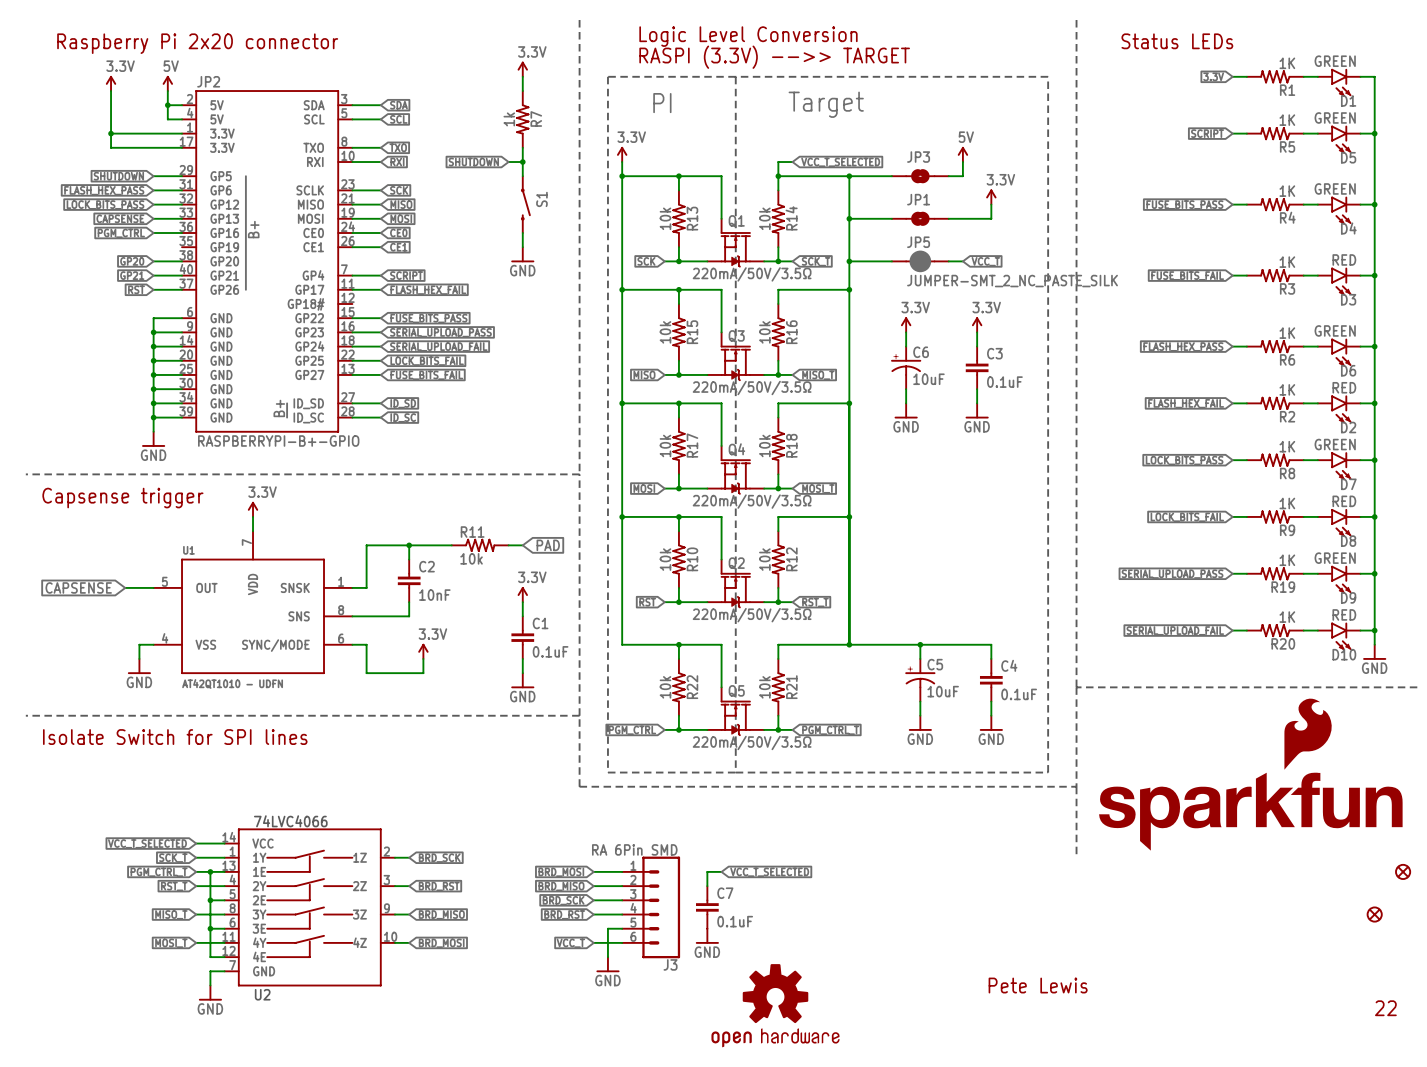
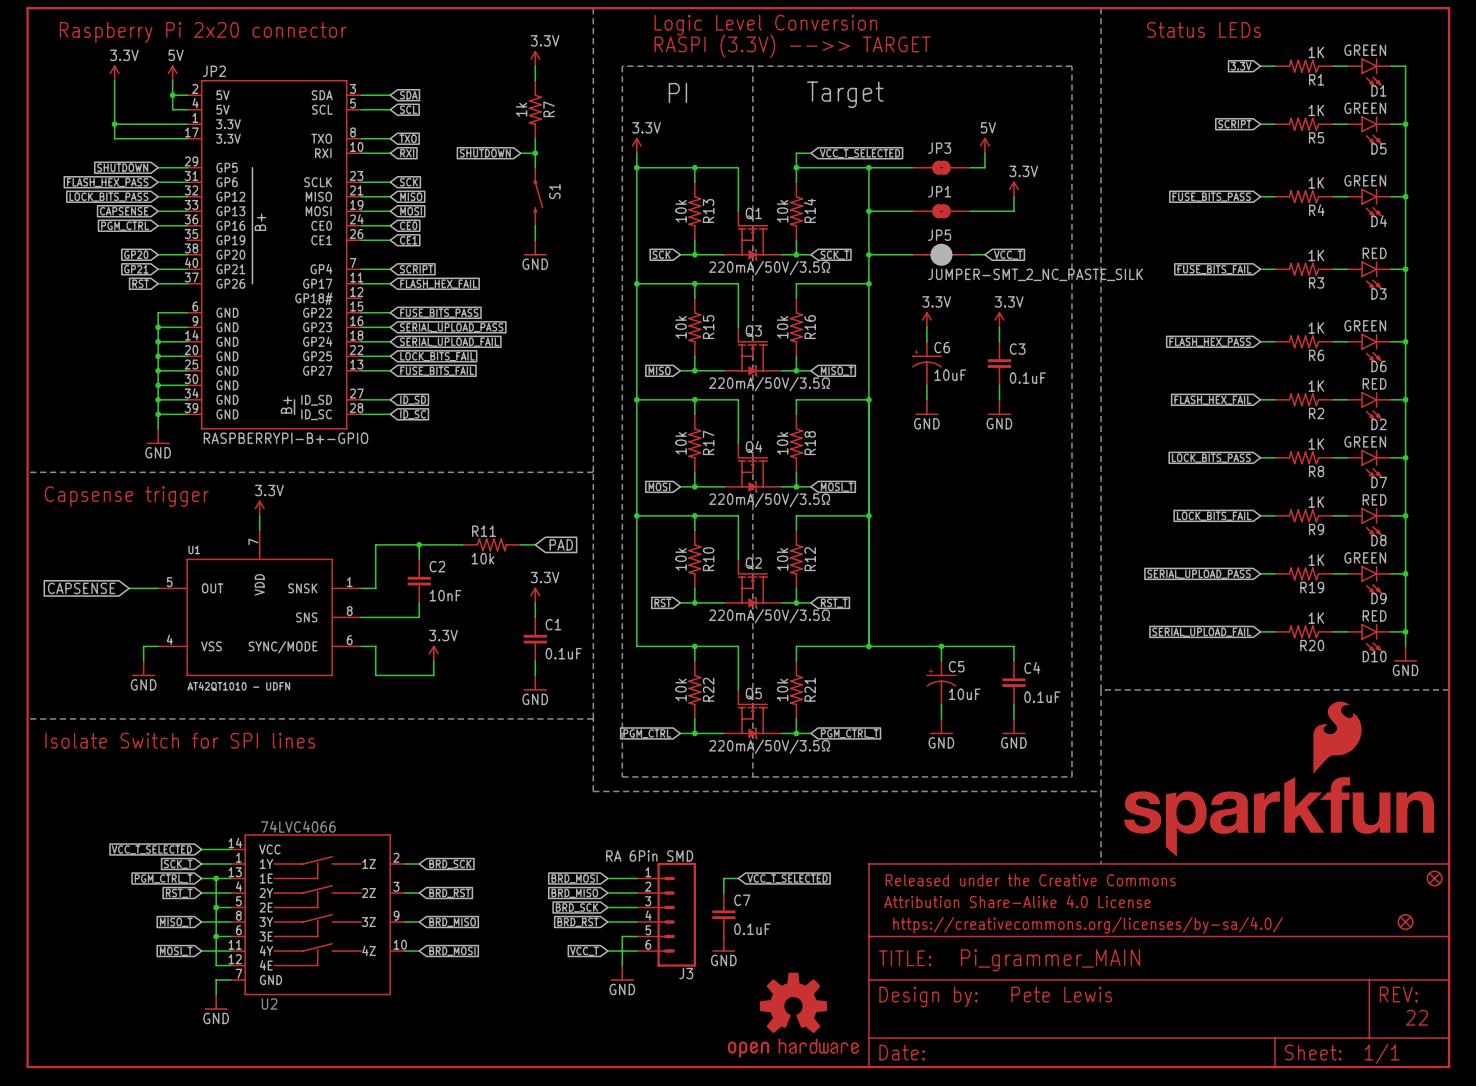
part: none -> (738, 537)
part: none -> (1159, 965)

